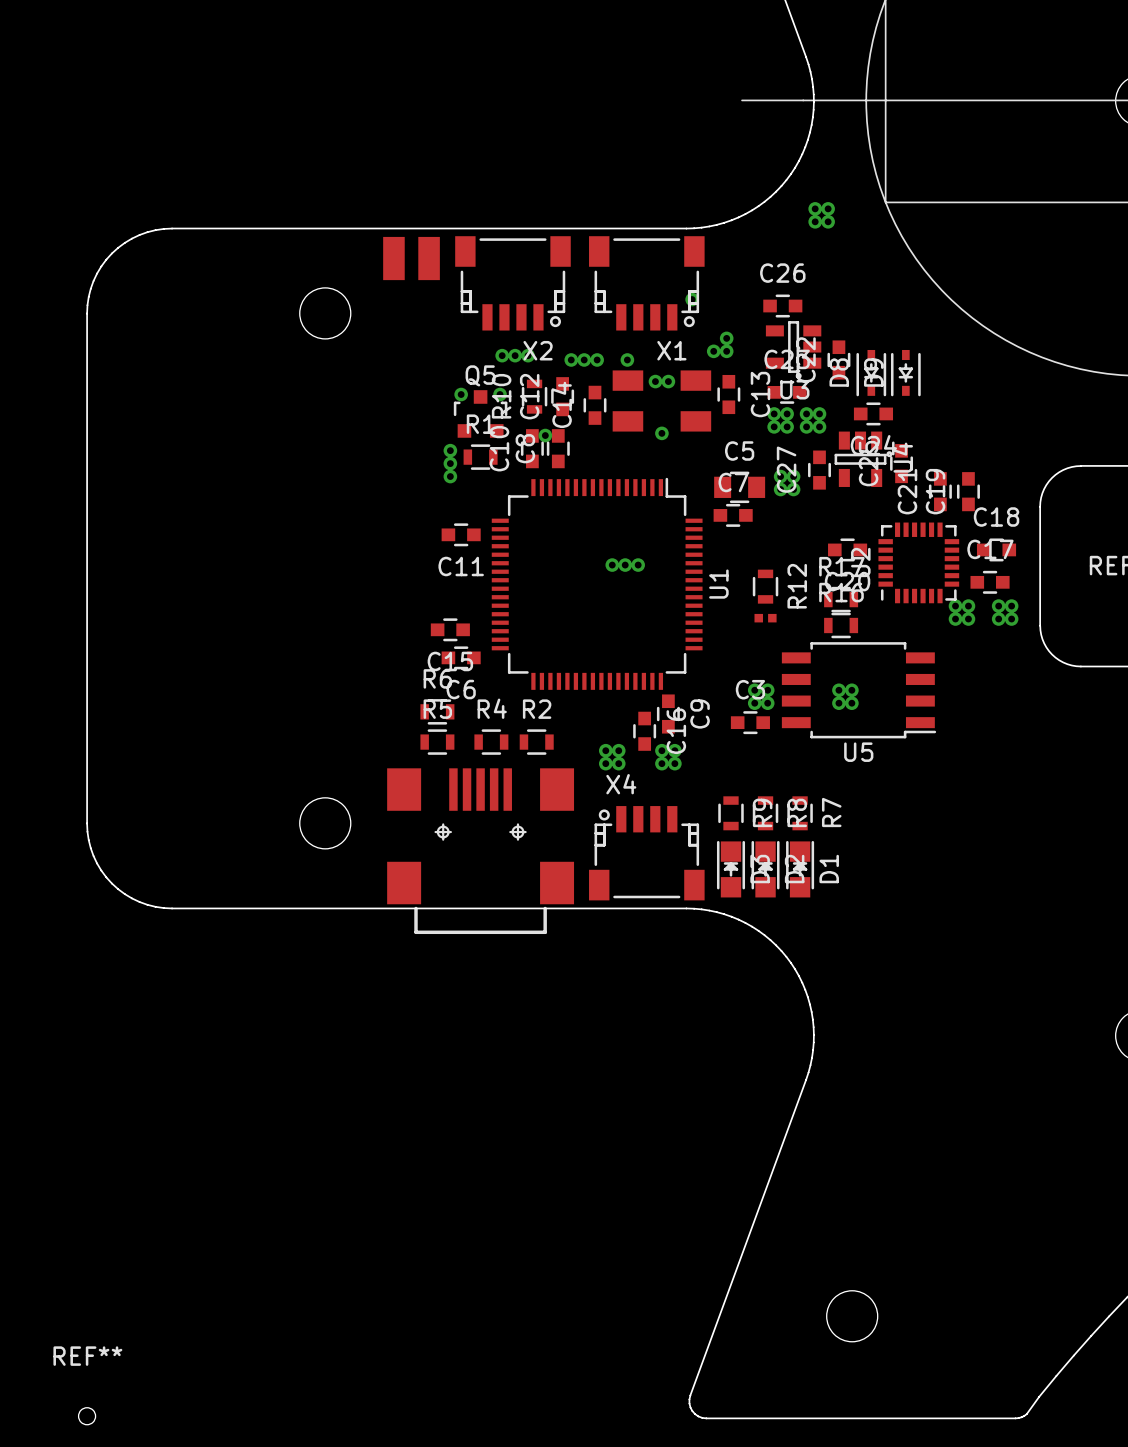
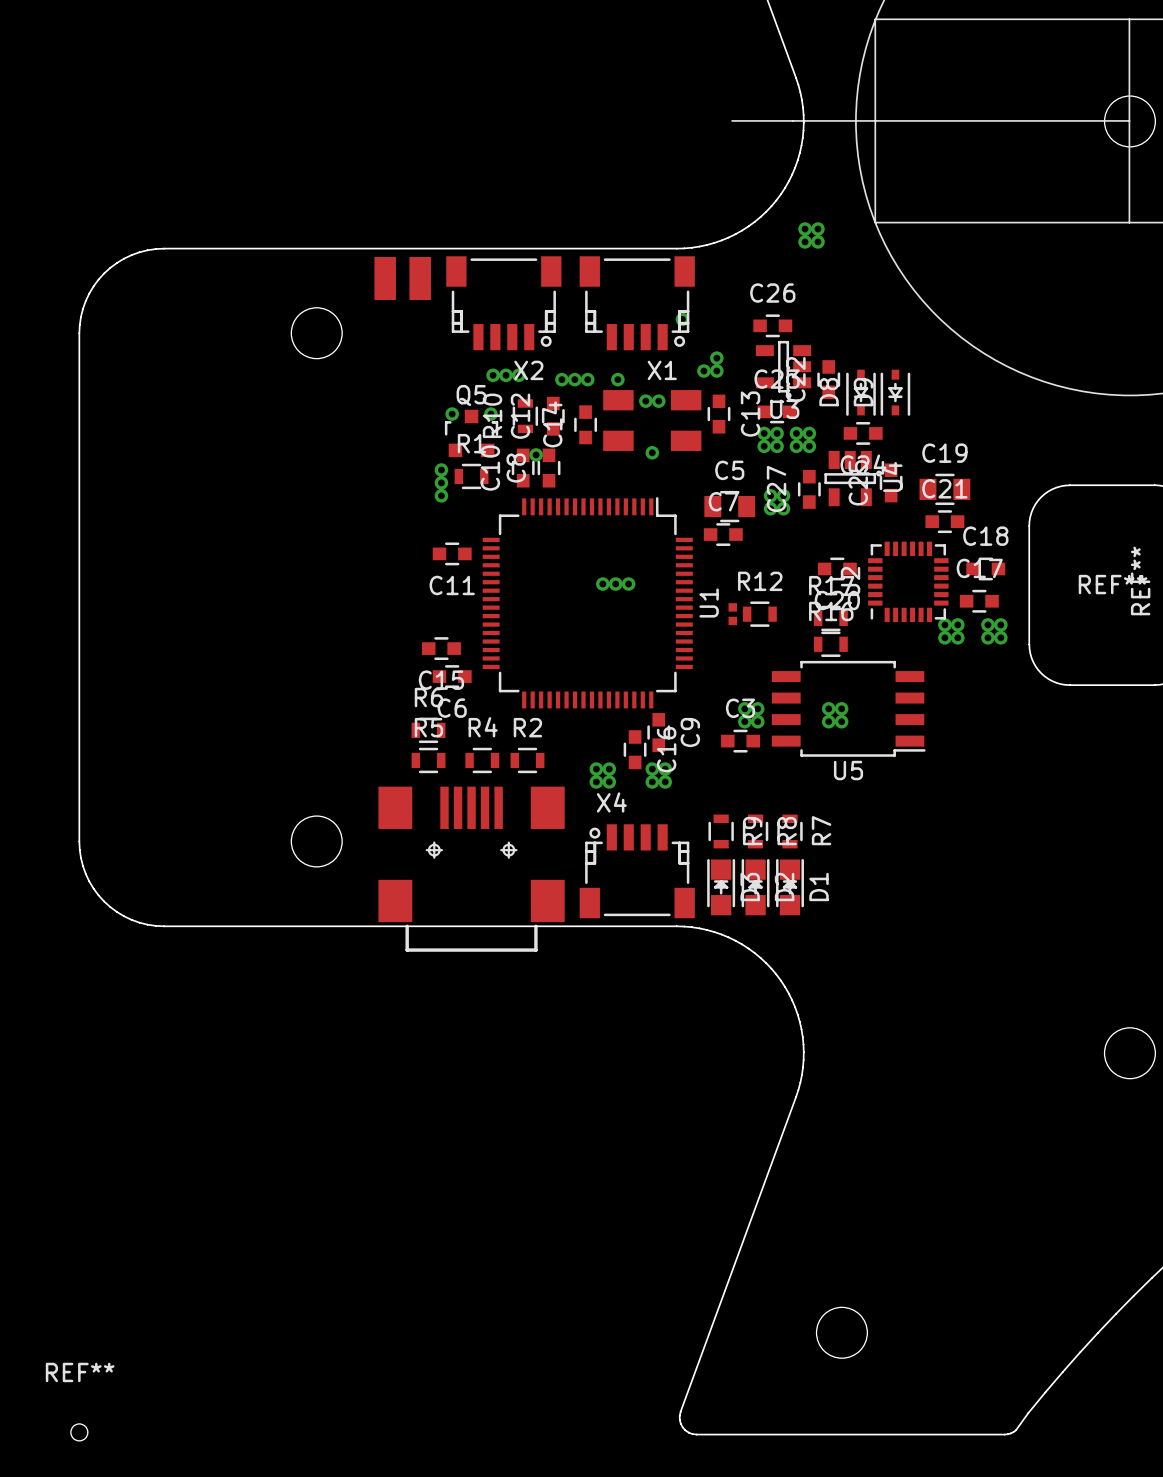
C19 footprint: [956, 472, 980, 512] -> [919, 473, 971, 506]
C19 name position: C19 (935, 491) -> C19 (944, 453)
C21 rotation: 0° (940, 491) -> 90° clockwise (944, 521)
R12 rotation: 0° (765, 586) -> 90° clockwise (759, 614)
R12 name position: R12 (797, 586) -> R12 (760, 581)
part rotation: 0° (765, 618) -> 90° clockwise (732, 614)
part position: (765, 618) -> (732, 614)

